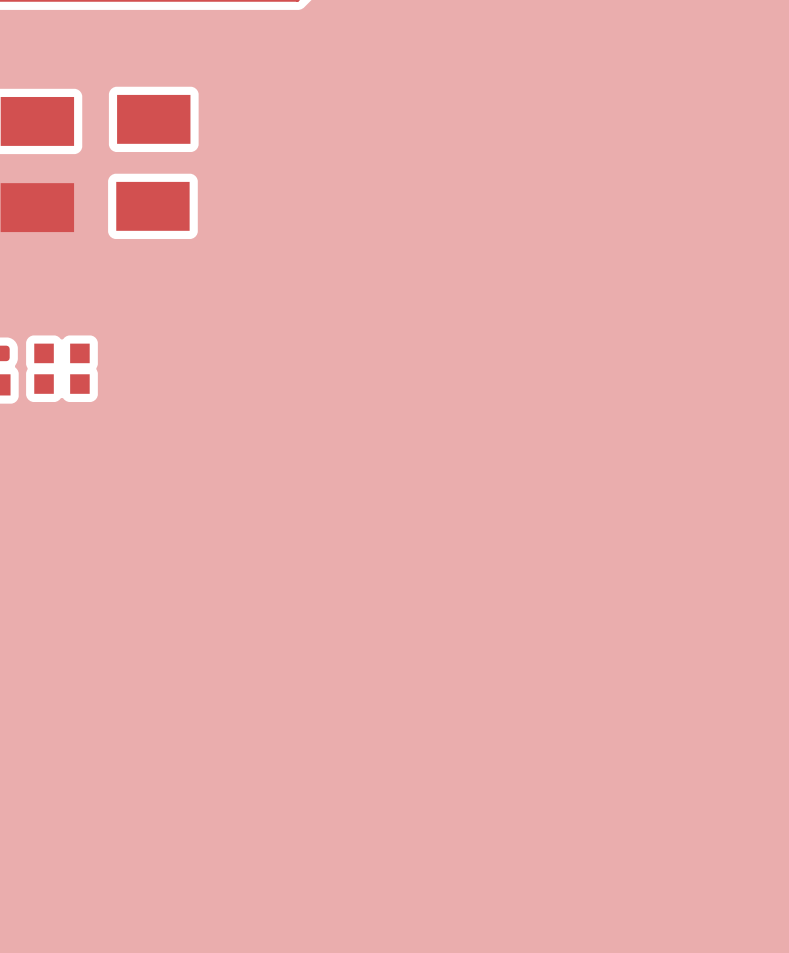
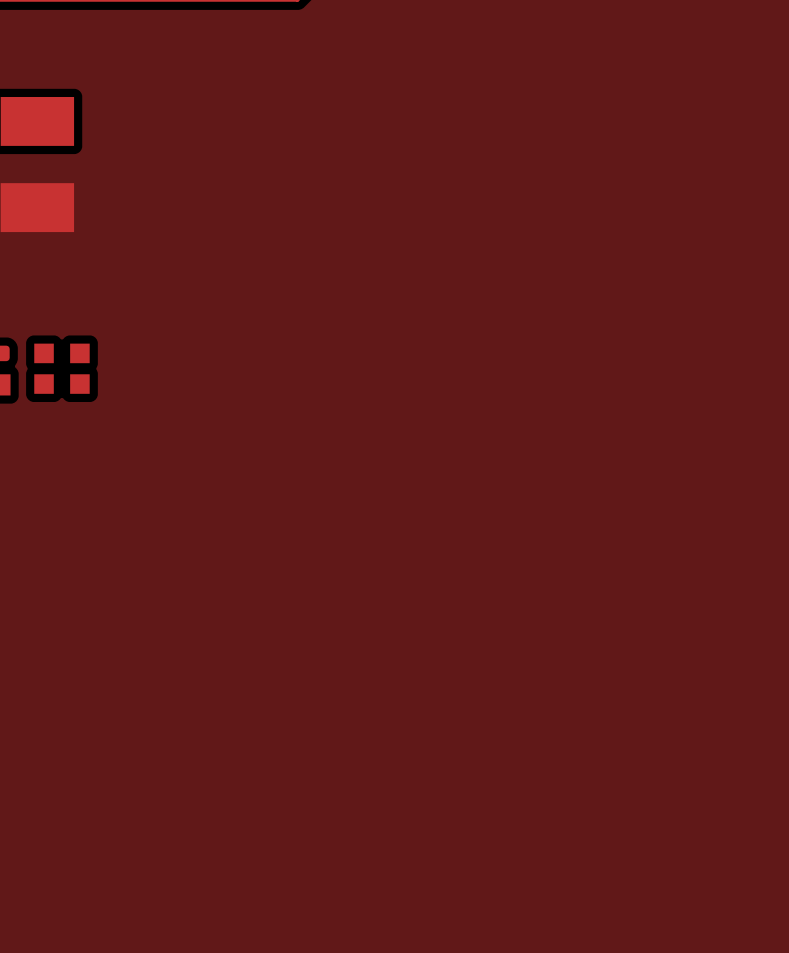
part: (153, 119) -> none
part: (152, 206) -> none

